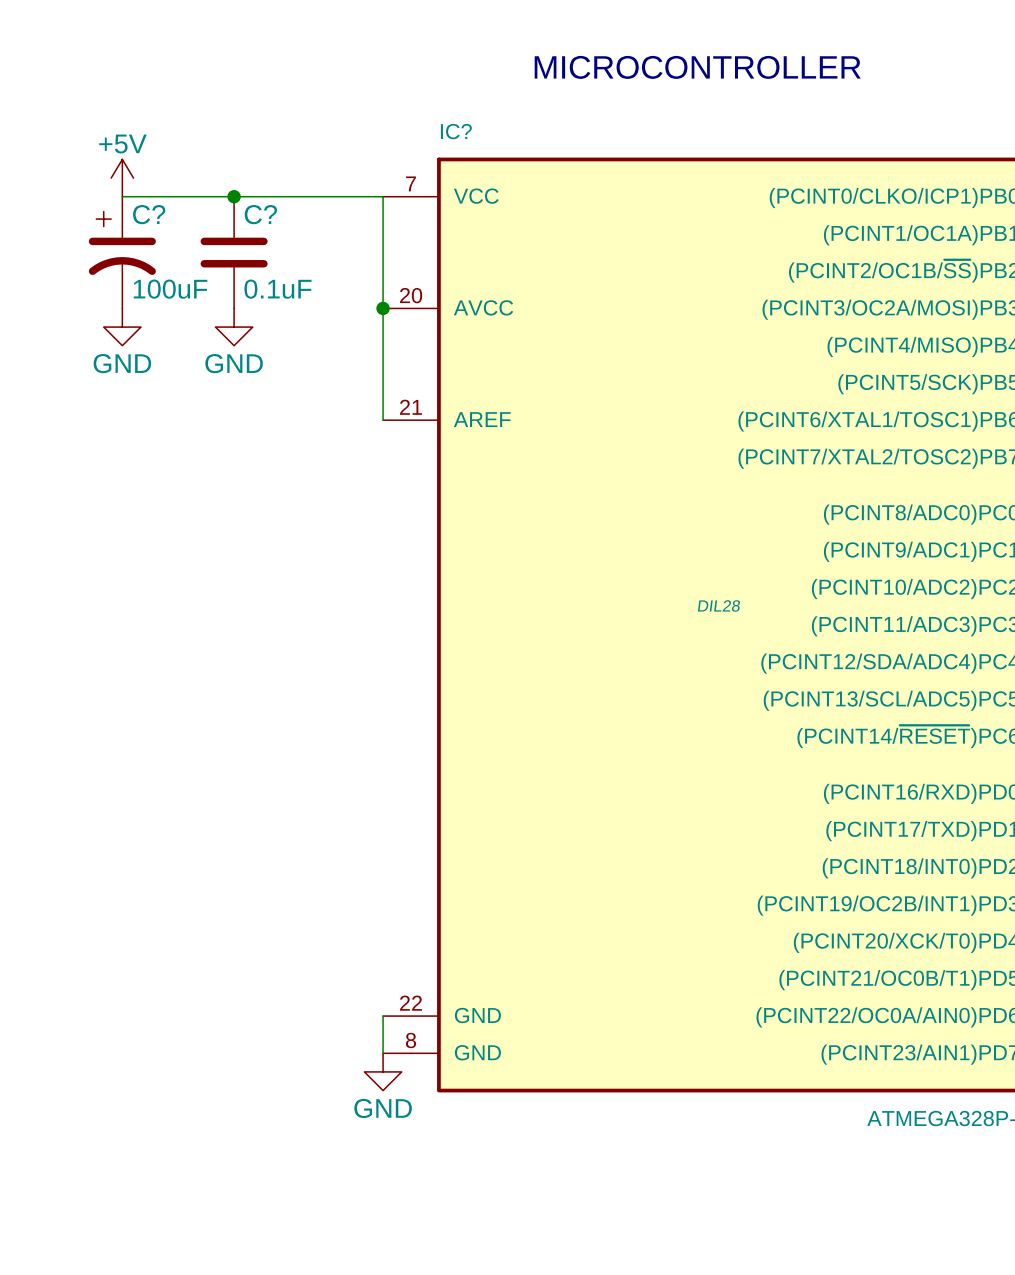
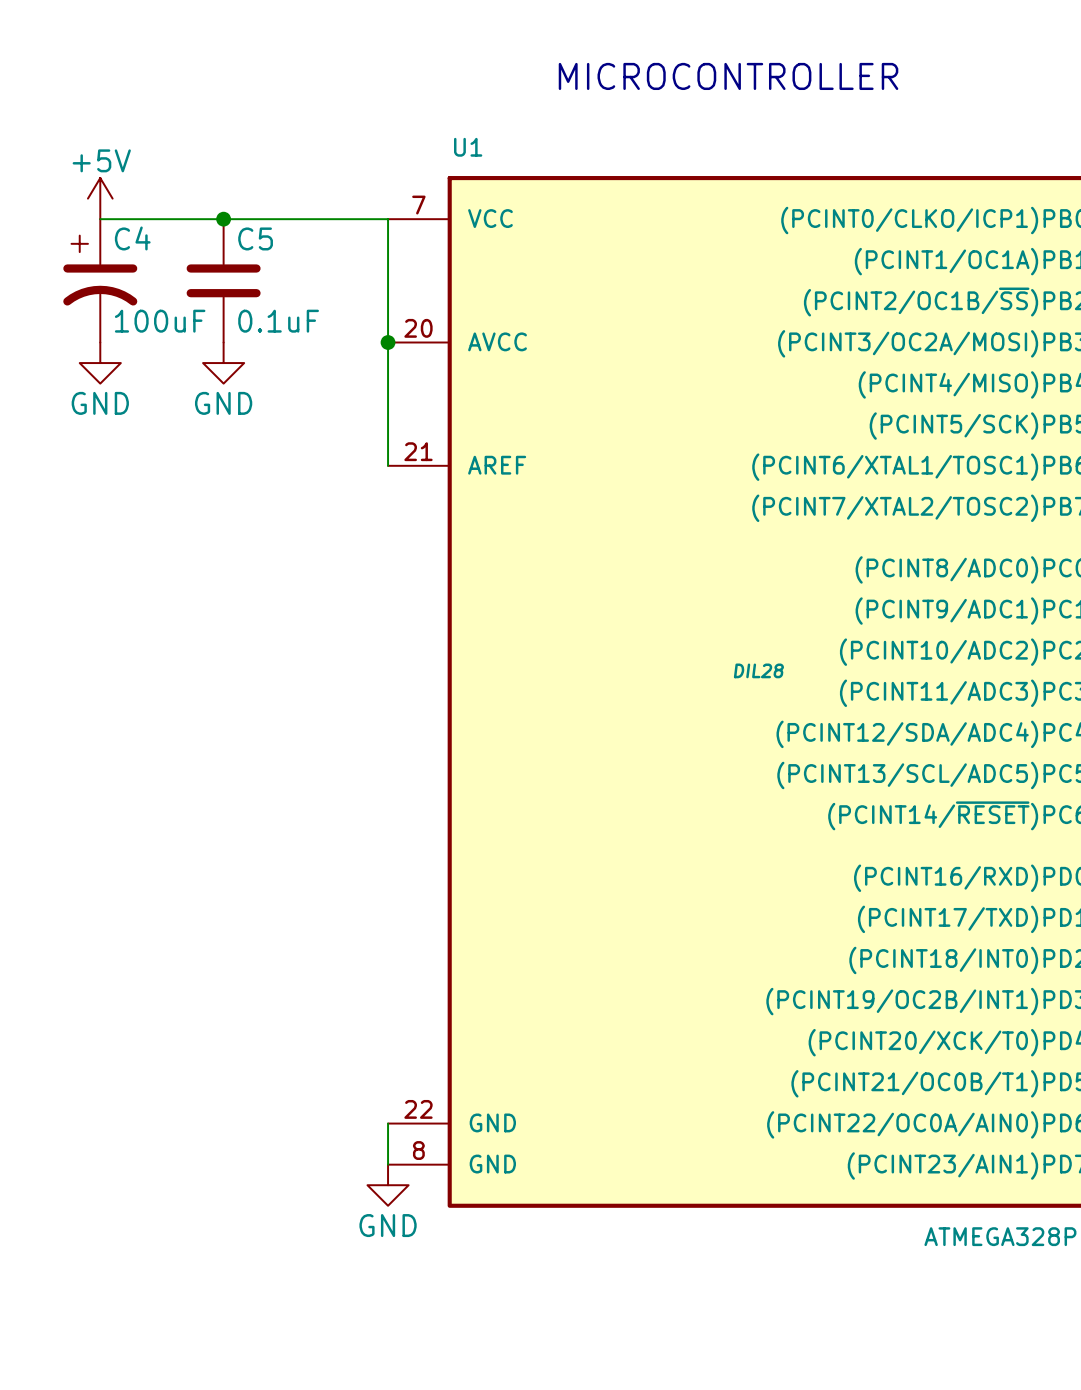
IC? name: IC? (456, 131) -> U1 (468, 147)
C? name: C? (149, 214) -> C4 (132, 238)
C? name: C? (260, 214) -> C5 (255, 238)

